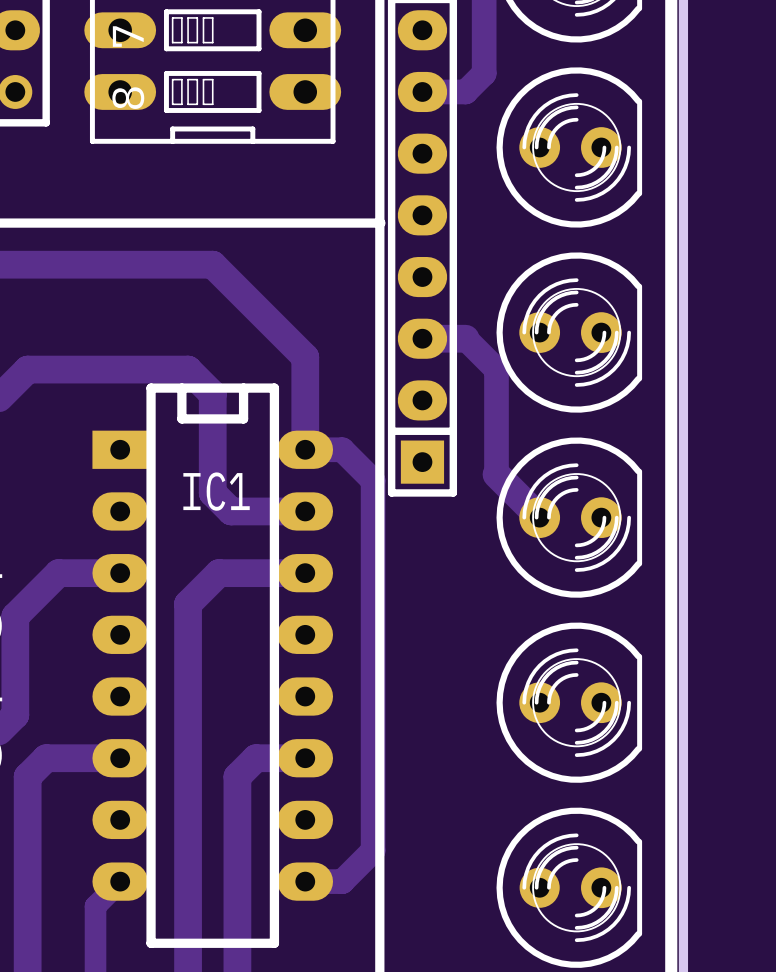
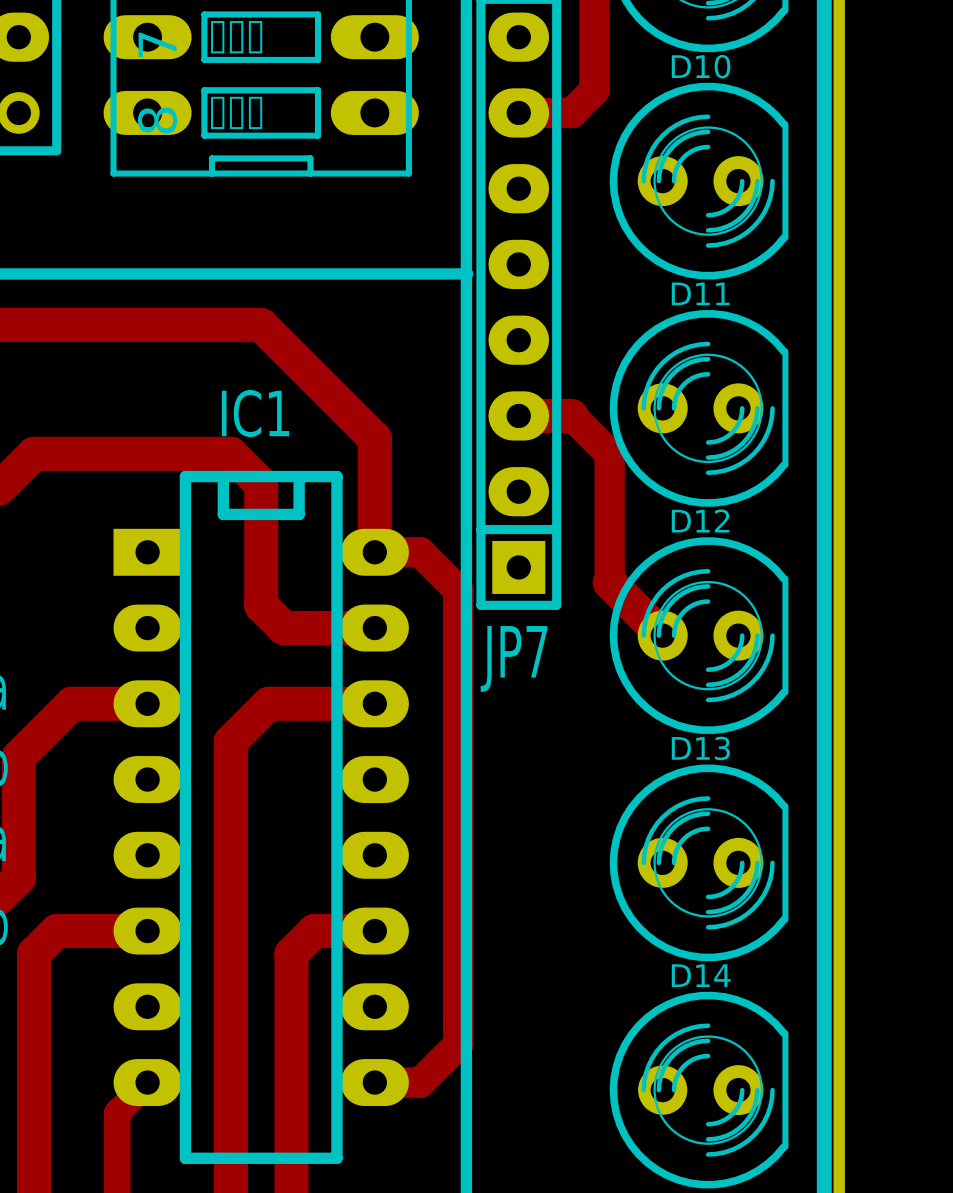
D10 name: none -> D10 (701, 66)
D11 name: none -> D11 (700, 293)
D12 name: none -> D12 (700, 520)
IC1 name position: IC1 (216, 491) -> IC1 (255, 413)
JP7 name: none -> JP7 (514, 658)
D13 name: none -> D13 (700, 748)
D14 name: none -> D14 (701, 975)

